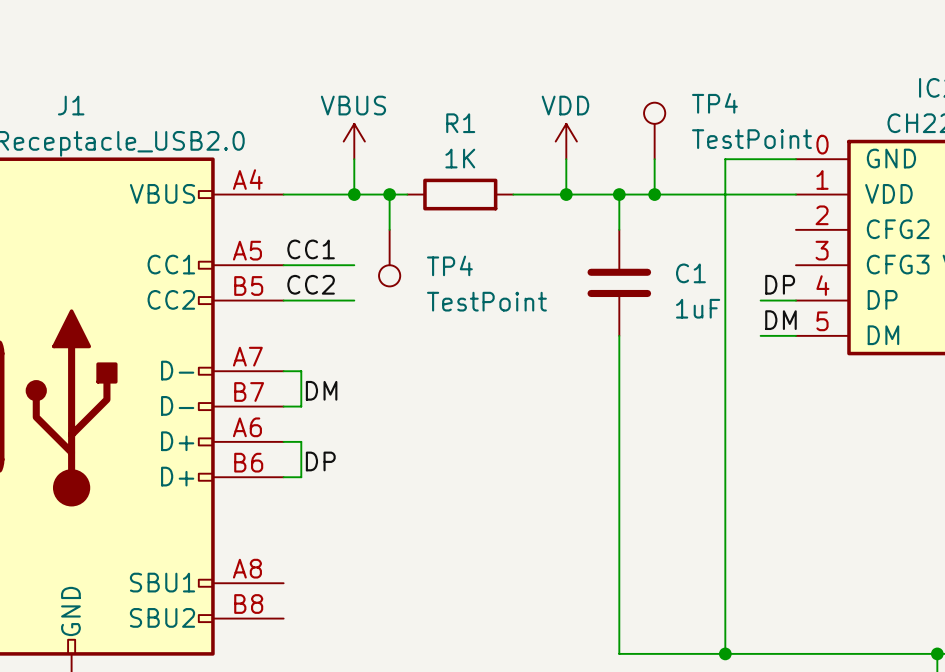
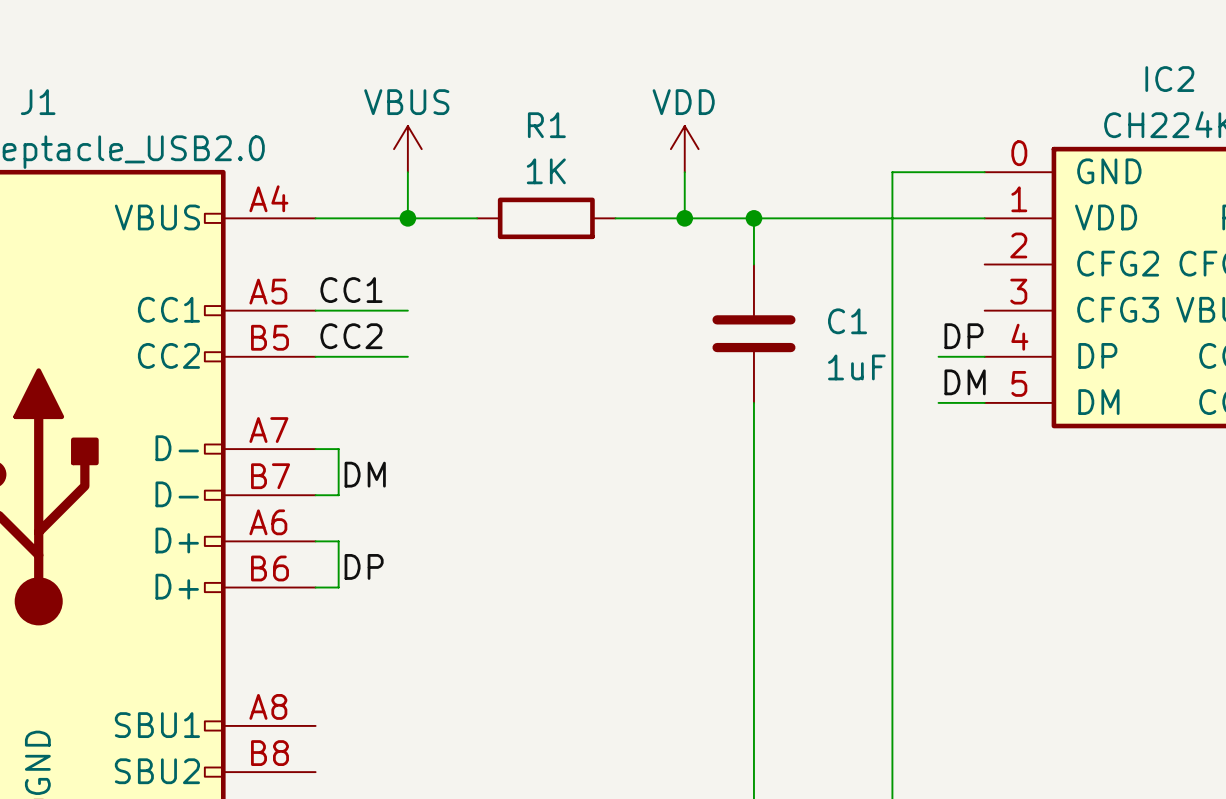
TP4: TestPoint (654, 130) -> none
wire: (654, 159) (654, 194) -> none
wire: (389, 194) (389, 229) -> none
junction: (389, 194) -> none
junction: (654, 194) -> none
TP4: TestPoint (389, 258) -> none

